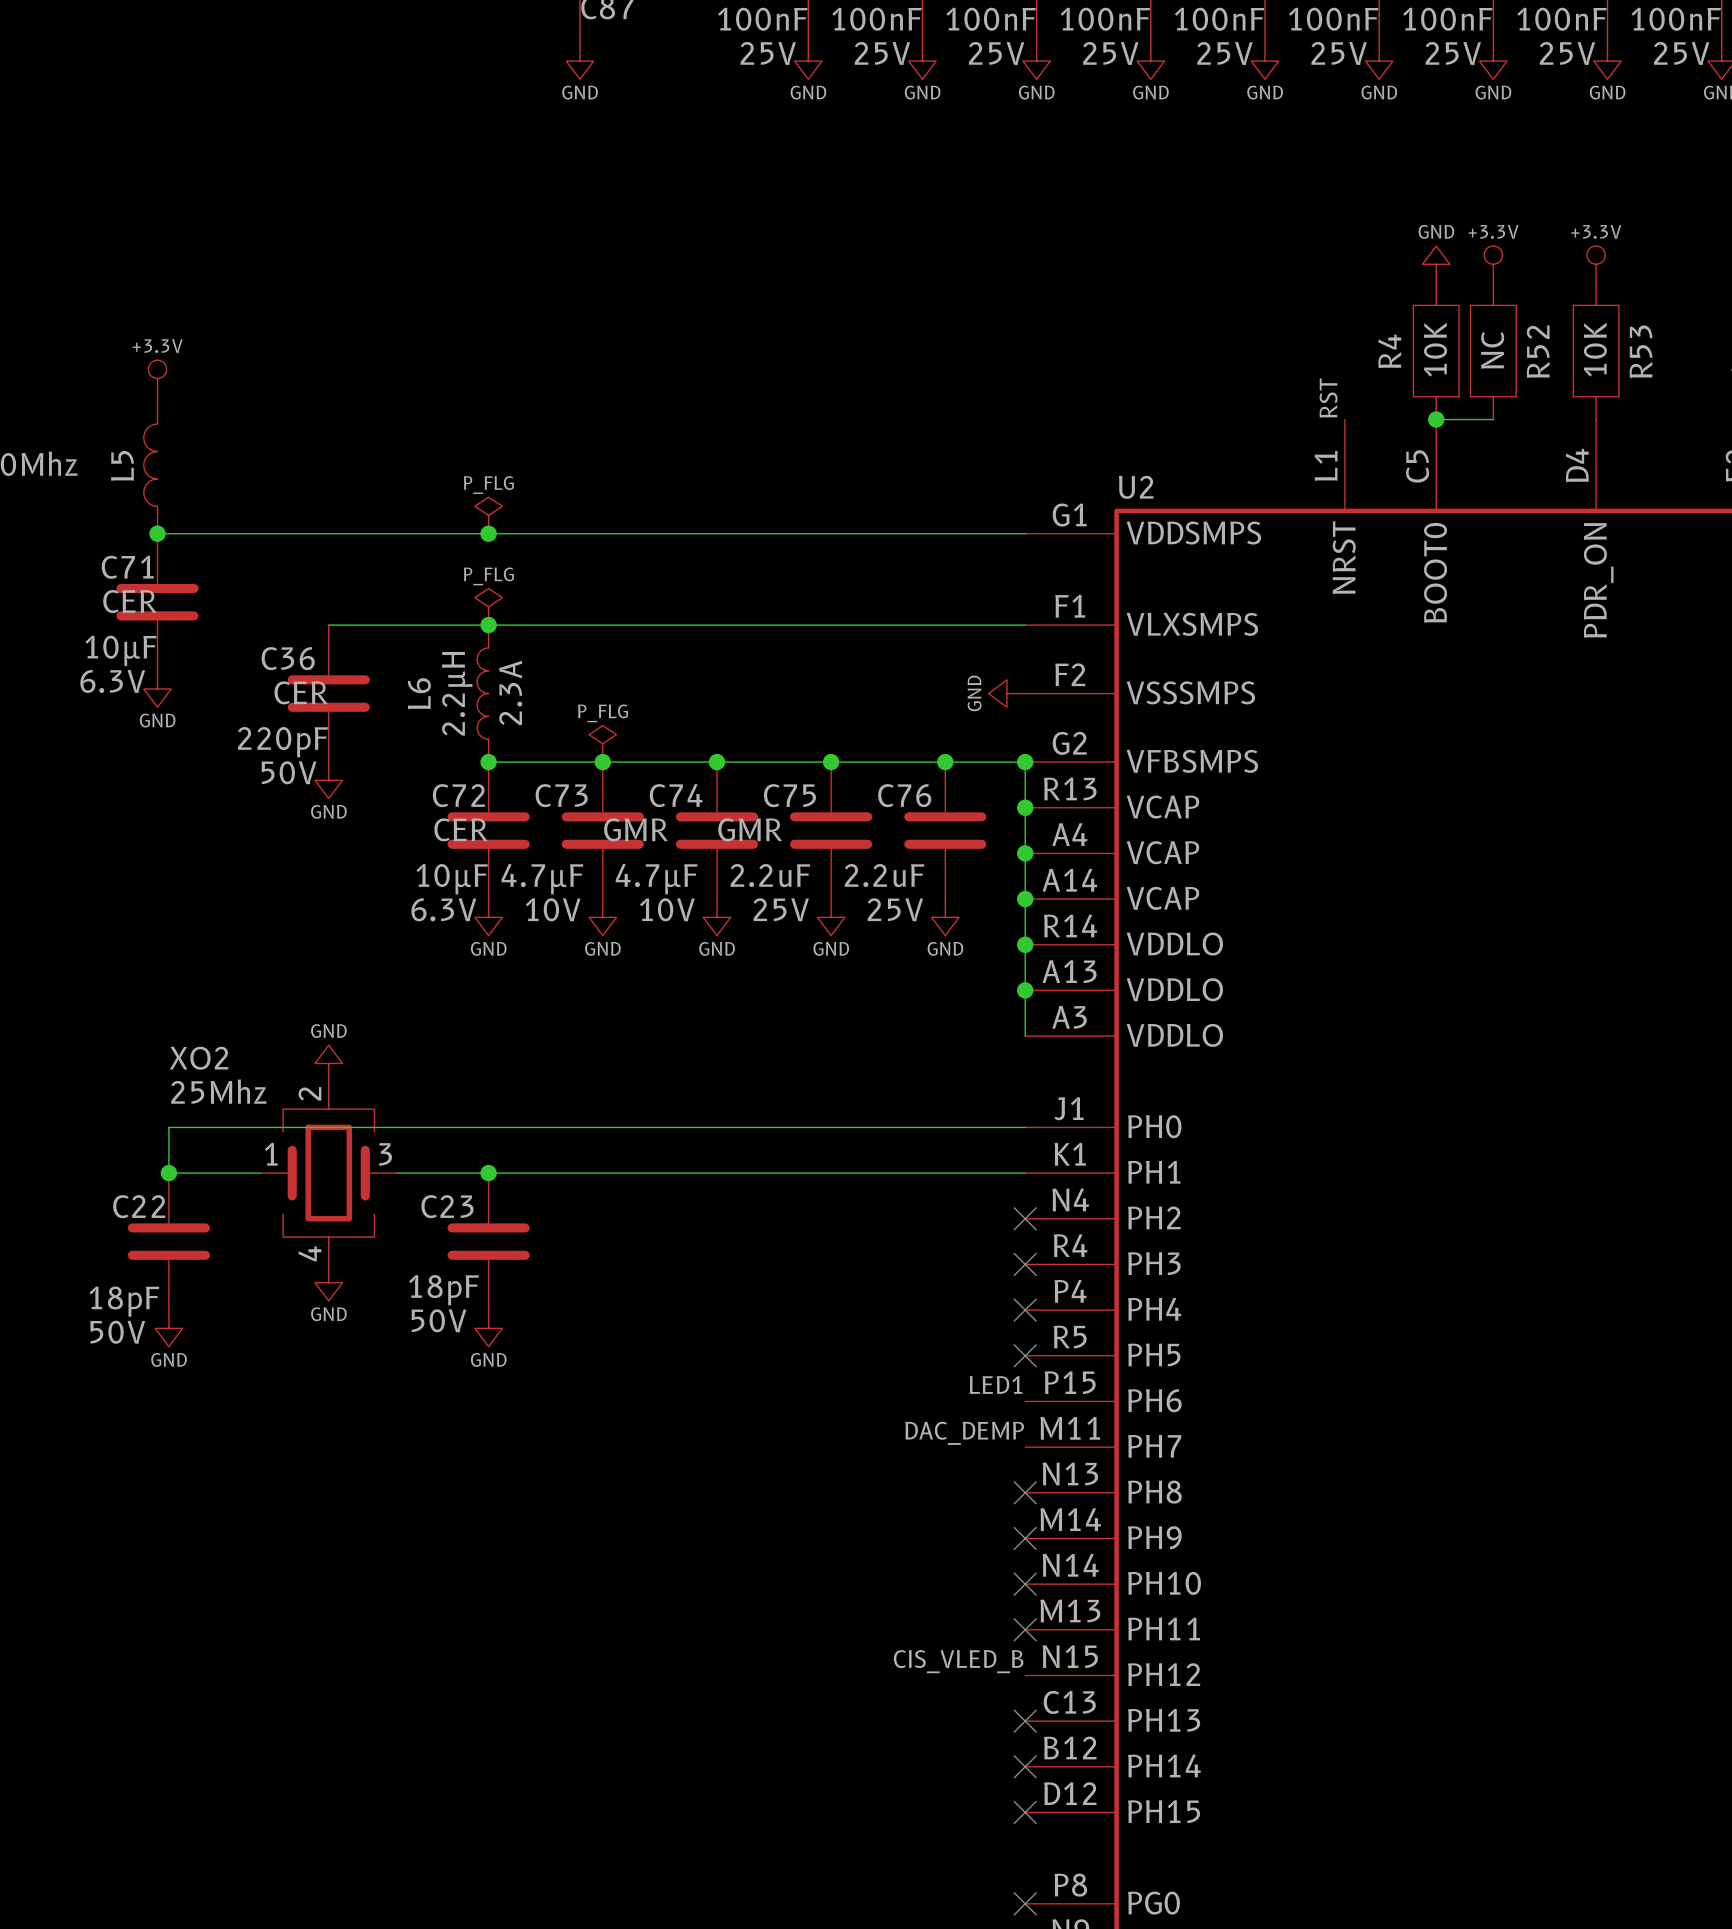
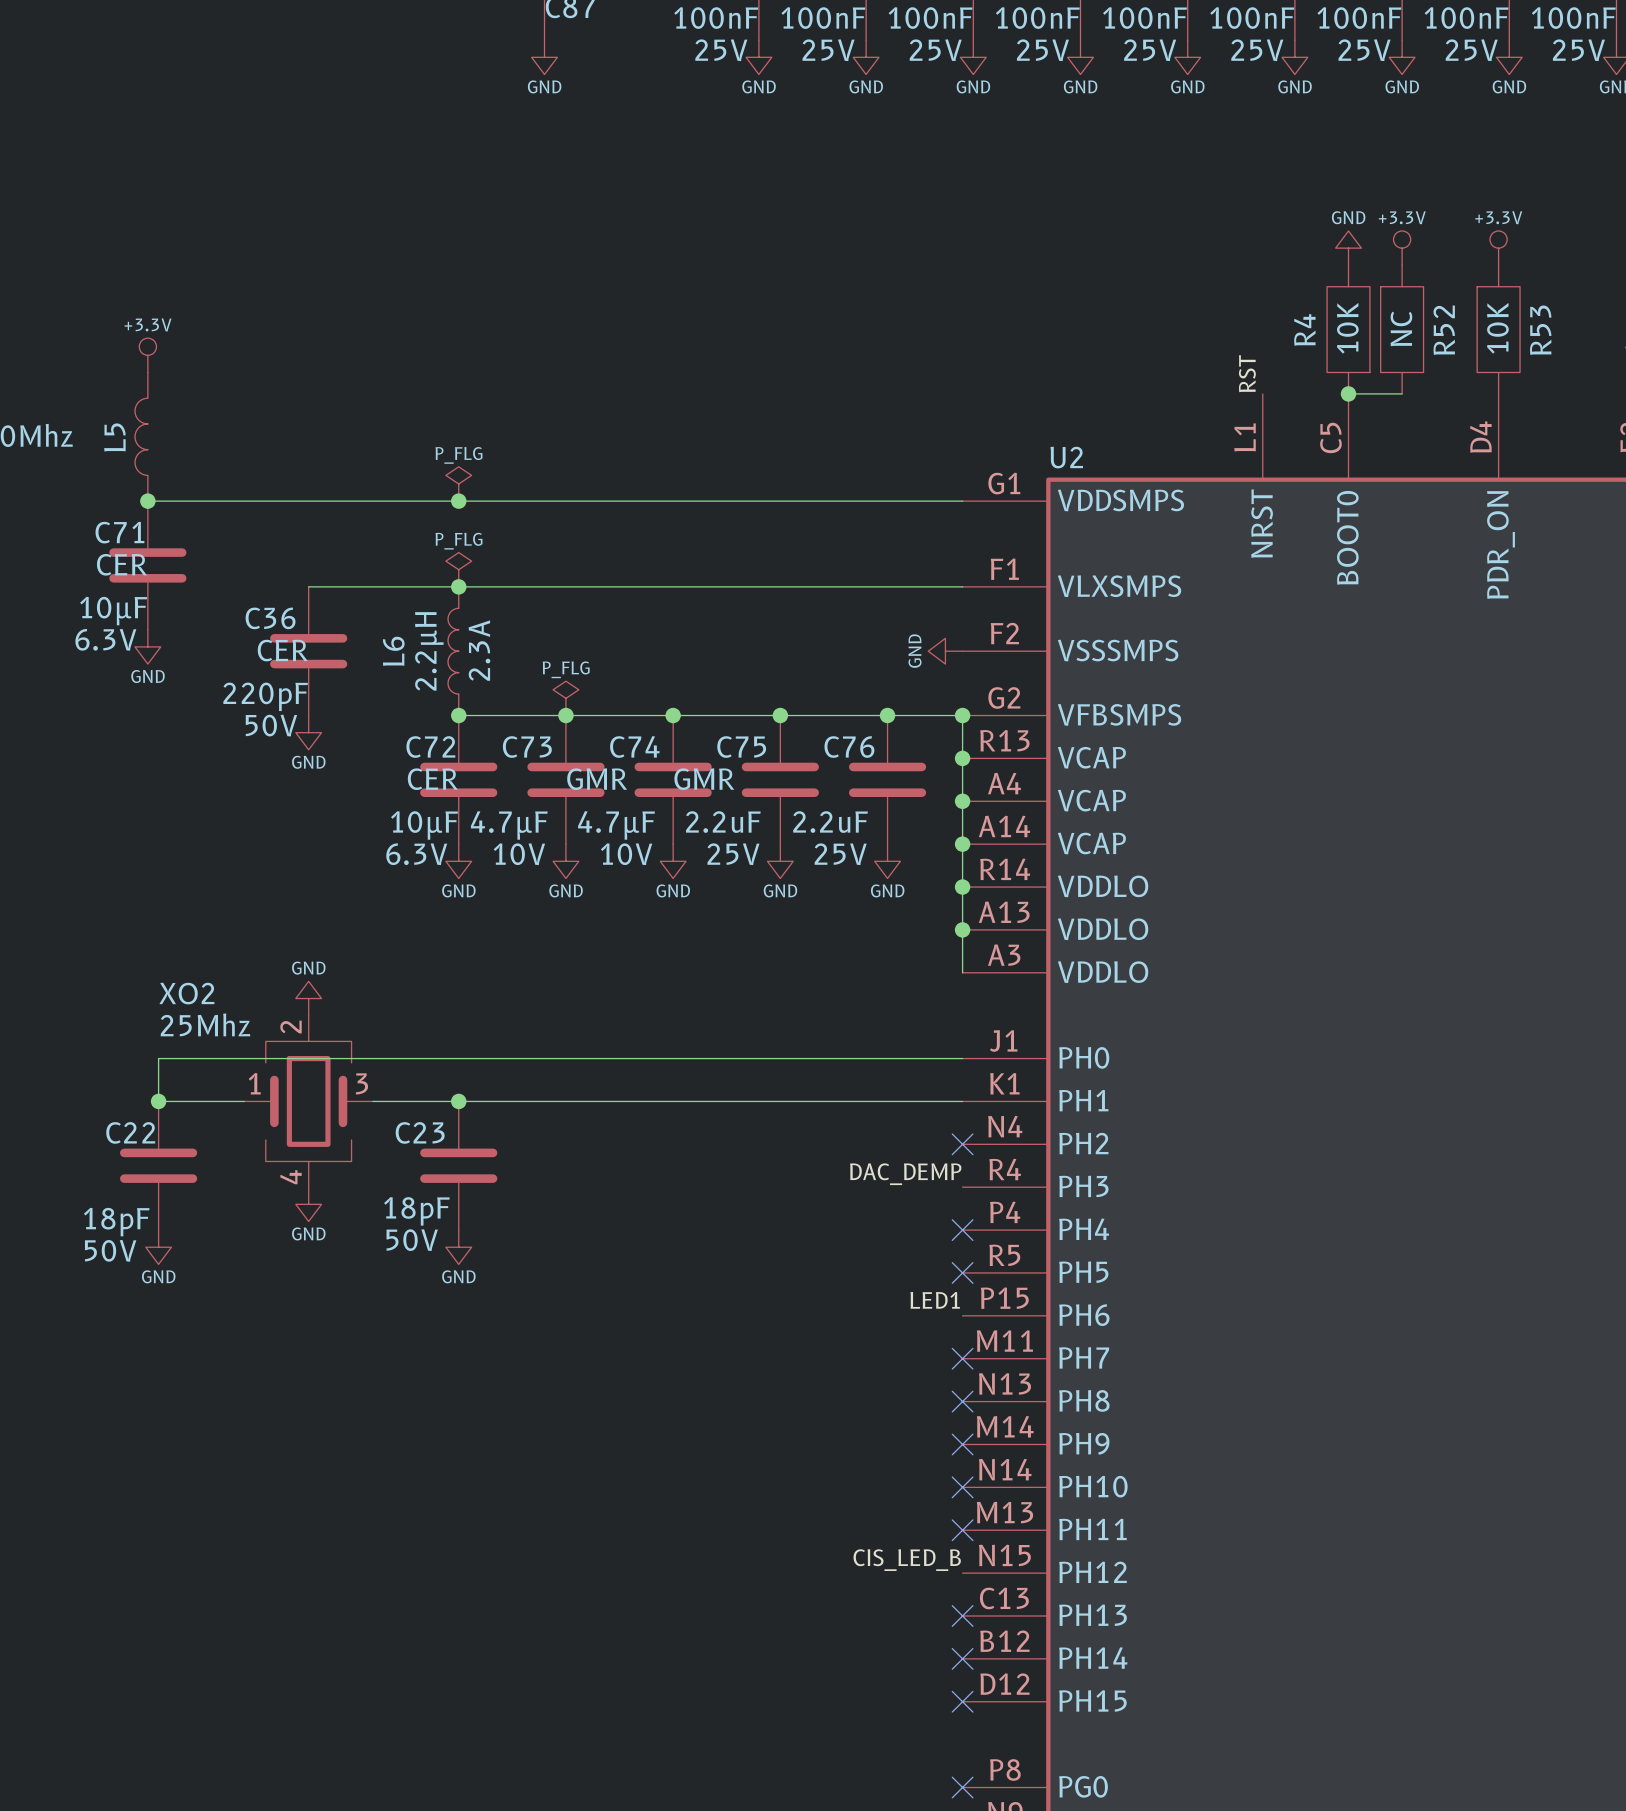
no-connect mark: (1025, 1264) -> none
label position: DAC_DEMP (964, 1433) -> DAC_DEMP (905, 1174)
no-connect mark: none -> (962, 1358)
label: CIS_VLED_B (958, 1661) -> CIS_LED_B (907, 1560)

